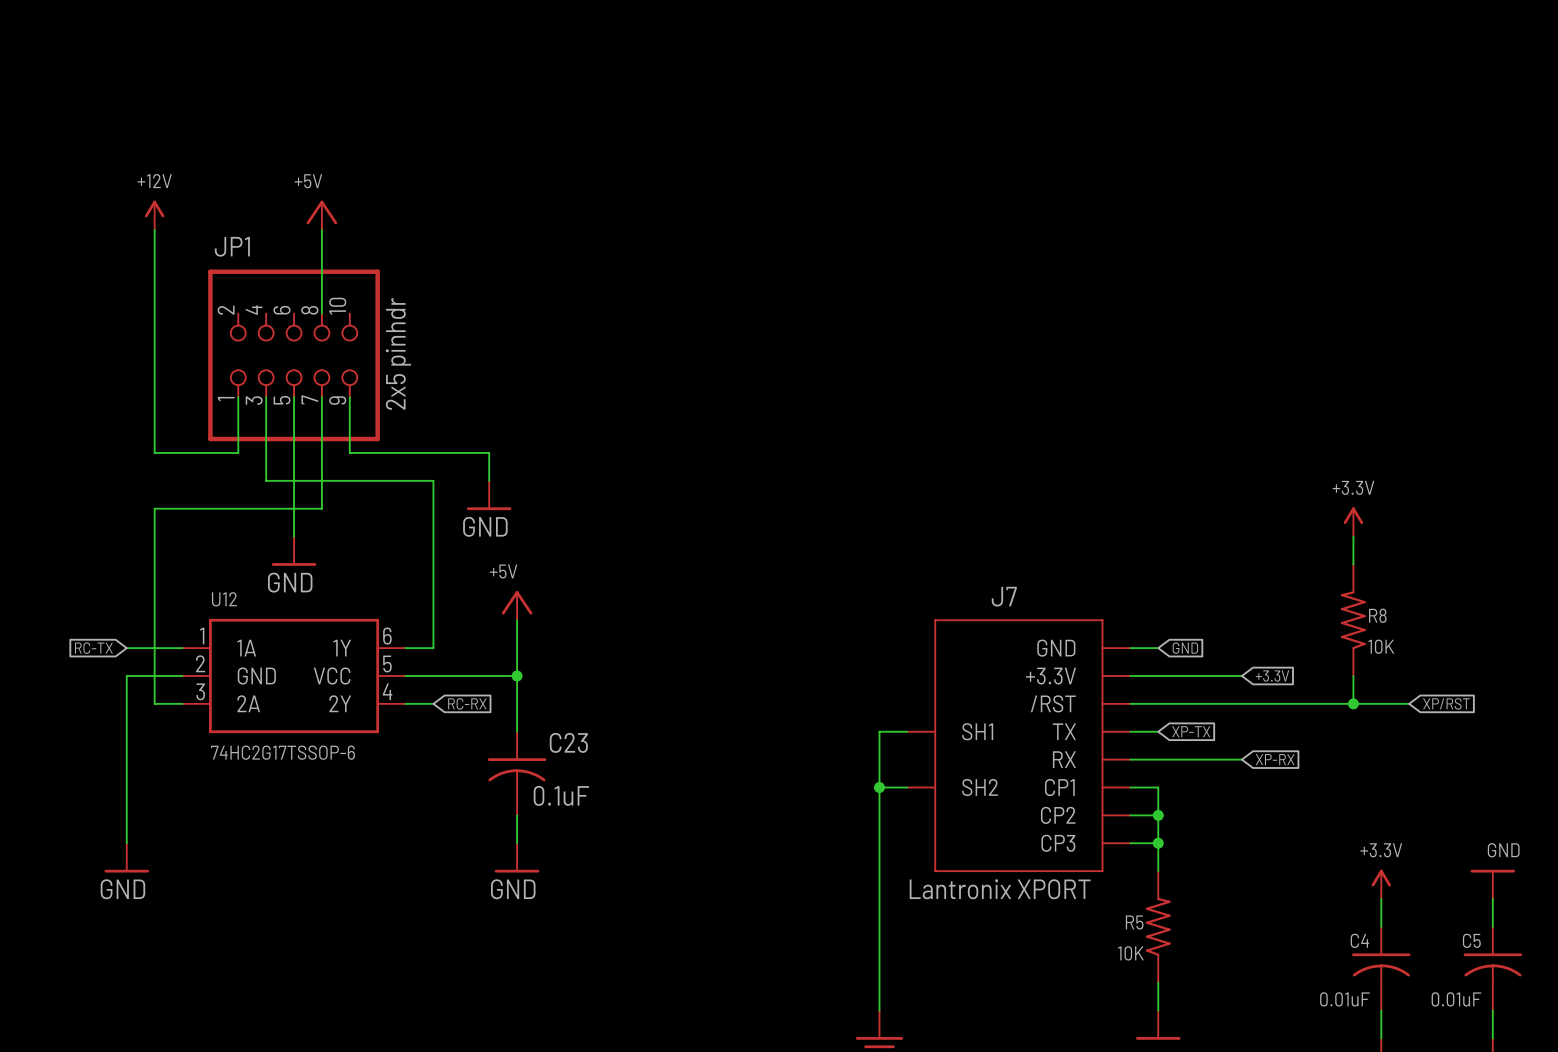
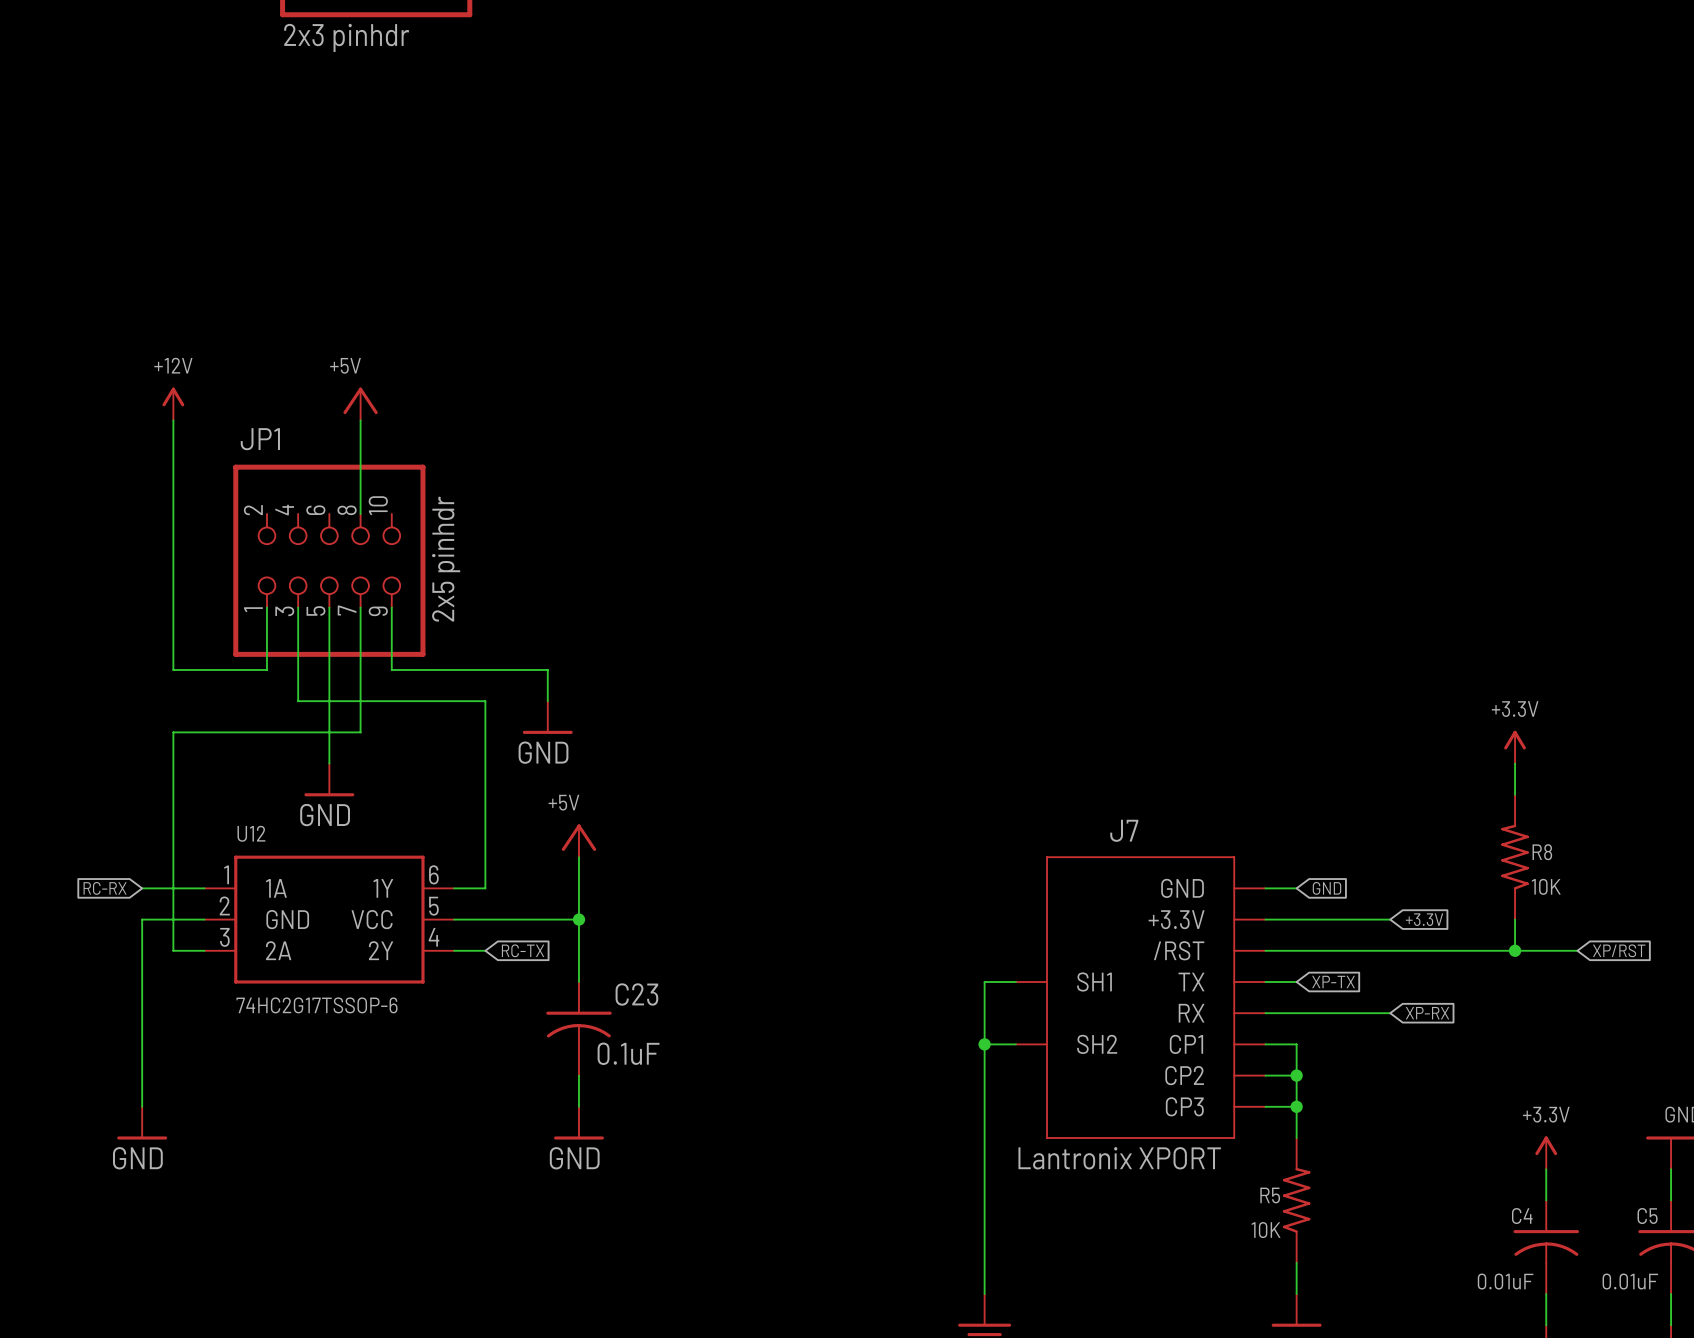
global label: RC-TX (93, 648) -> RC-RX (105, 888)
global label: RC-RX (467, 703) -> RC-TX (523, 950)

